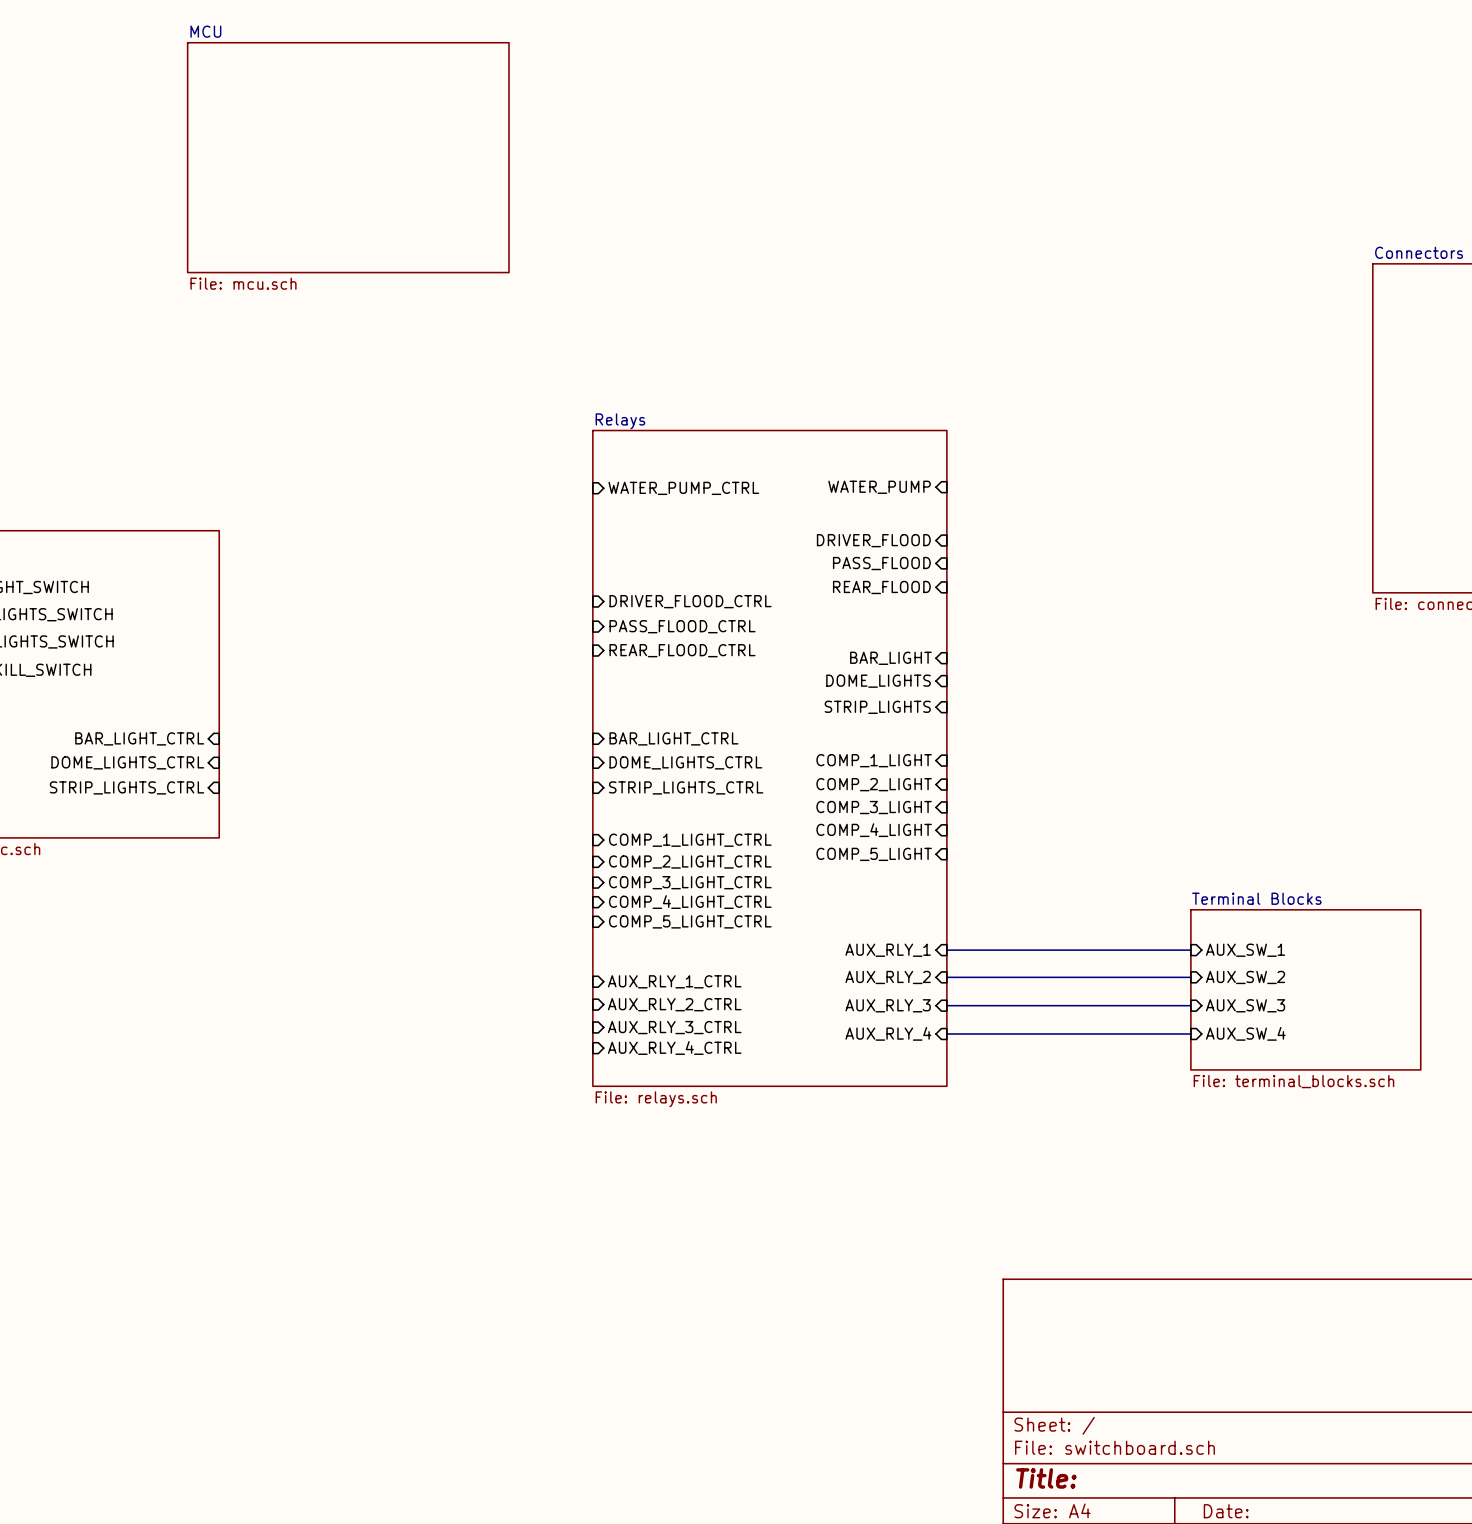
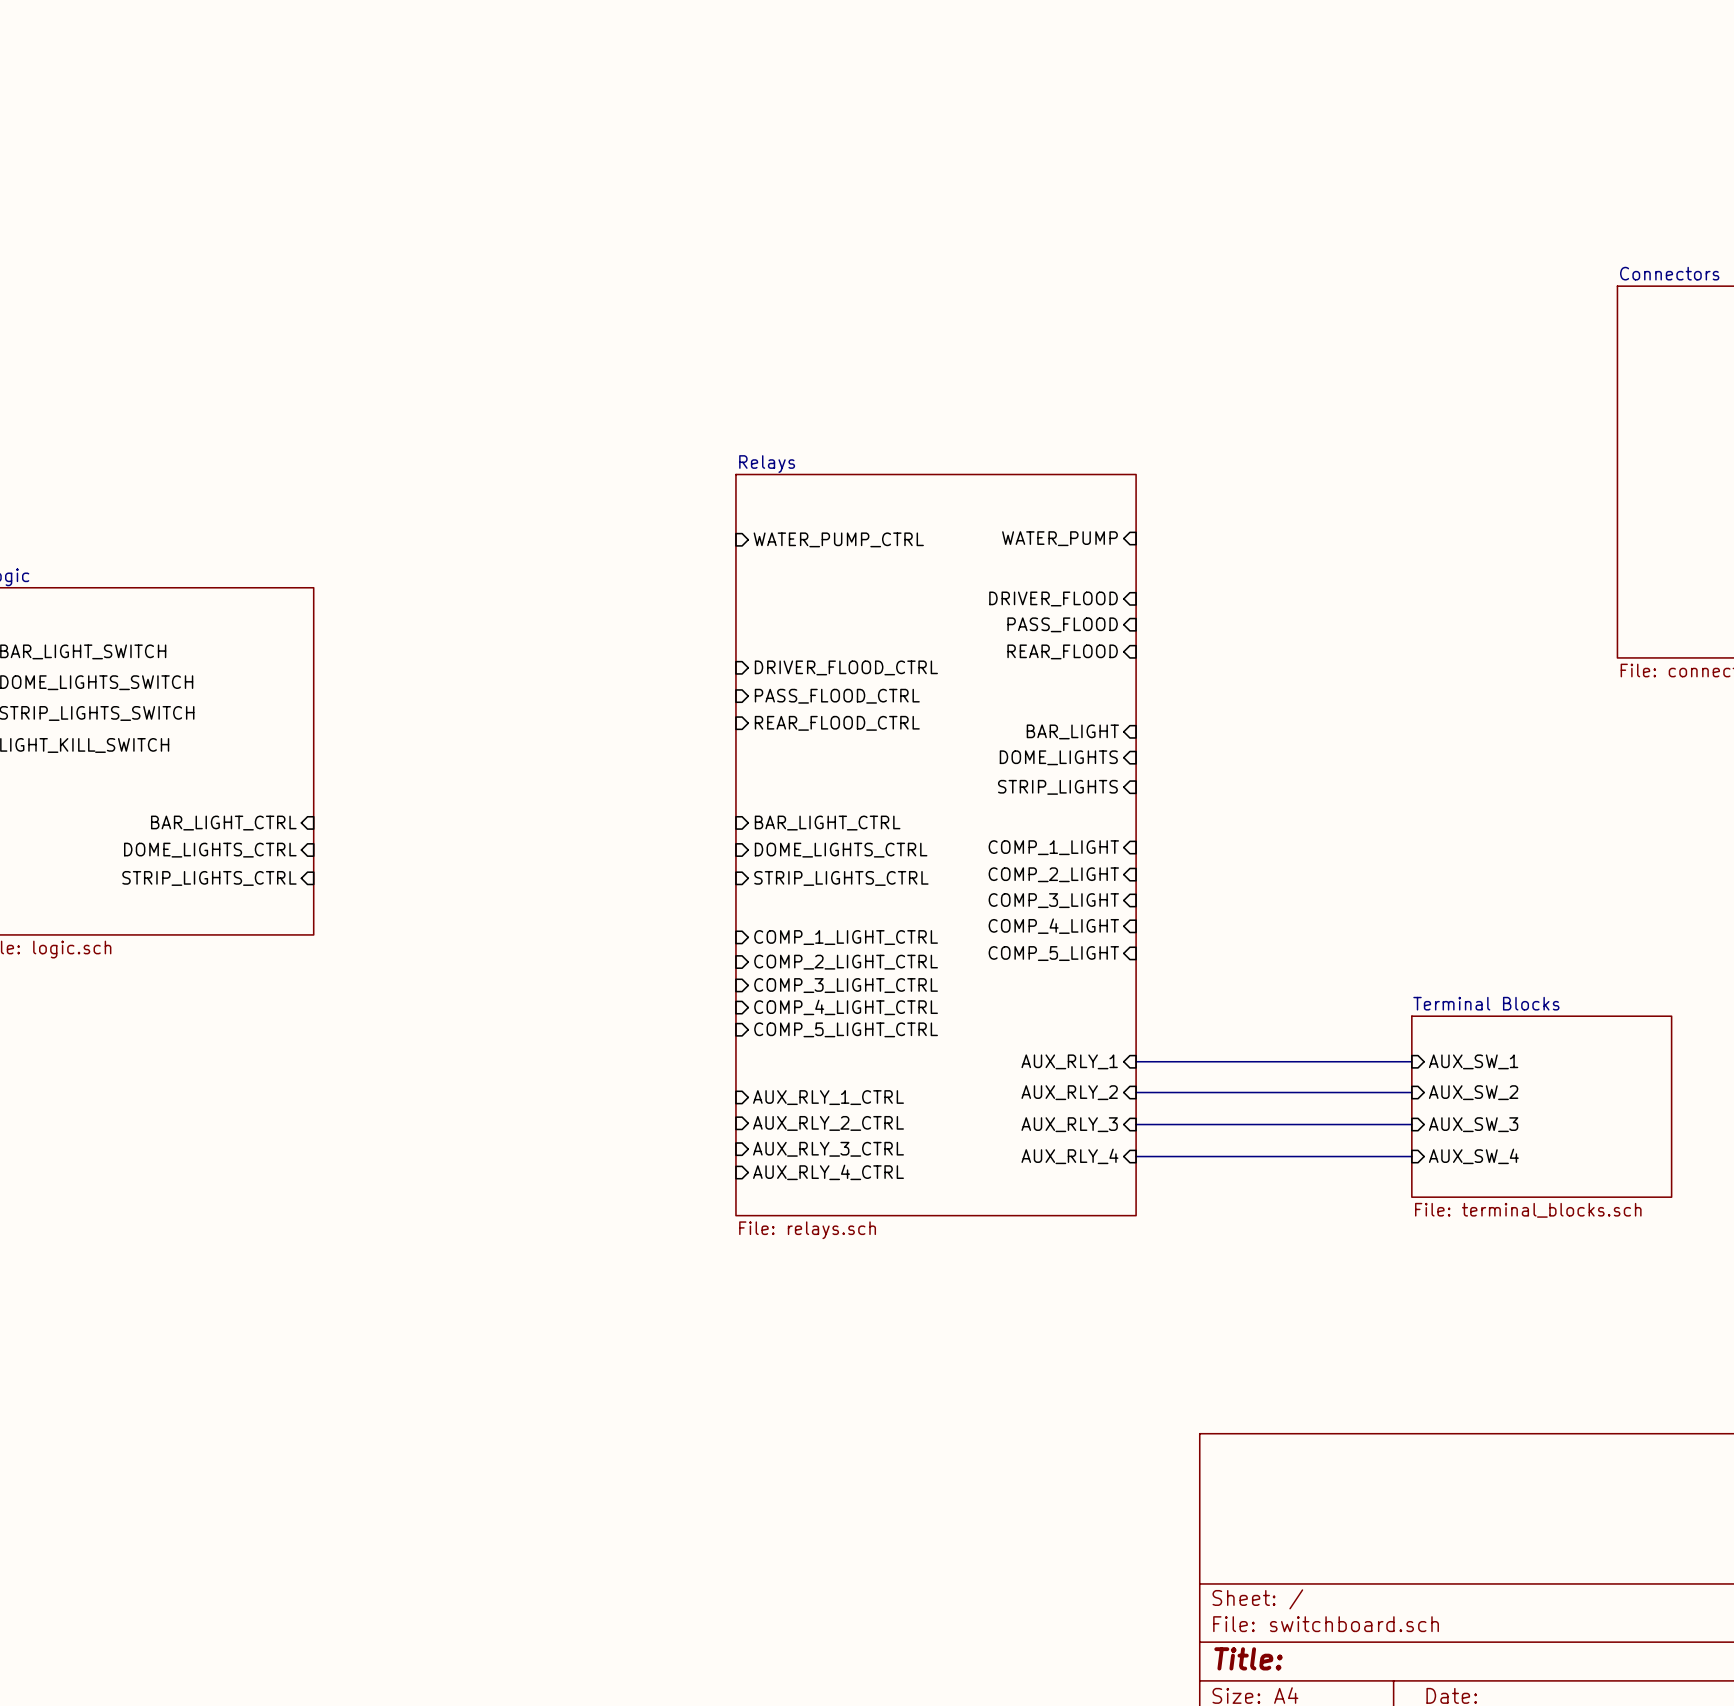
sheet MCU: File: mcu.sch (348, 157) -> none

